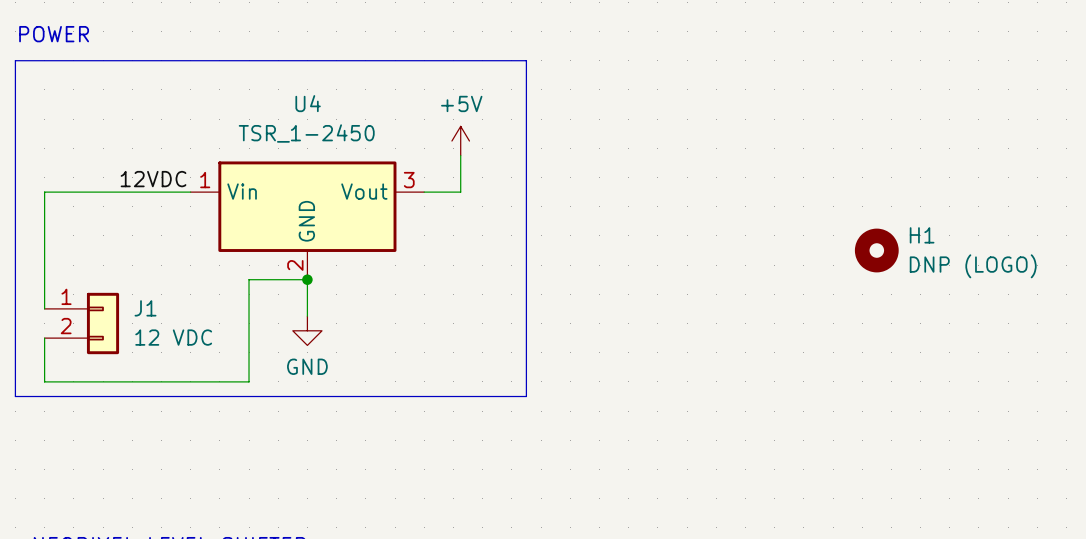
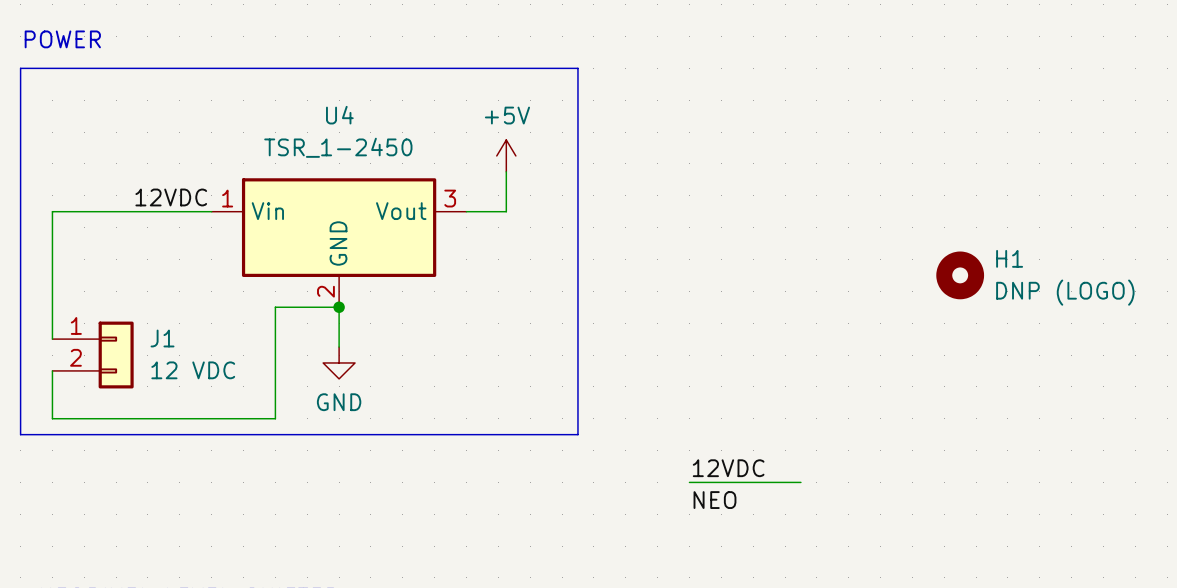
label: none -> 12VDC (728, 468)
wire: none -> (689, 482) (800, 482)
label: none -> NEO (714, 500)

